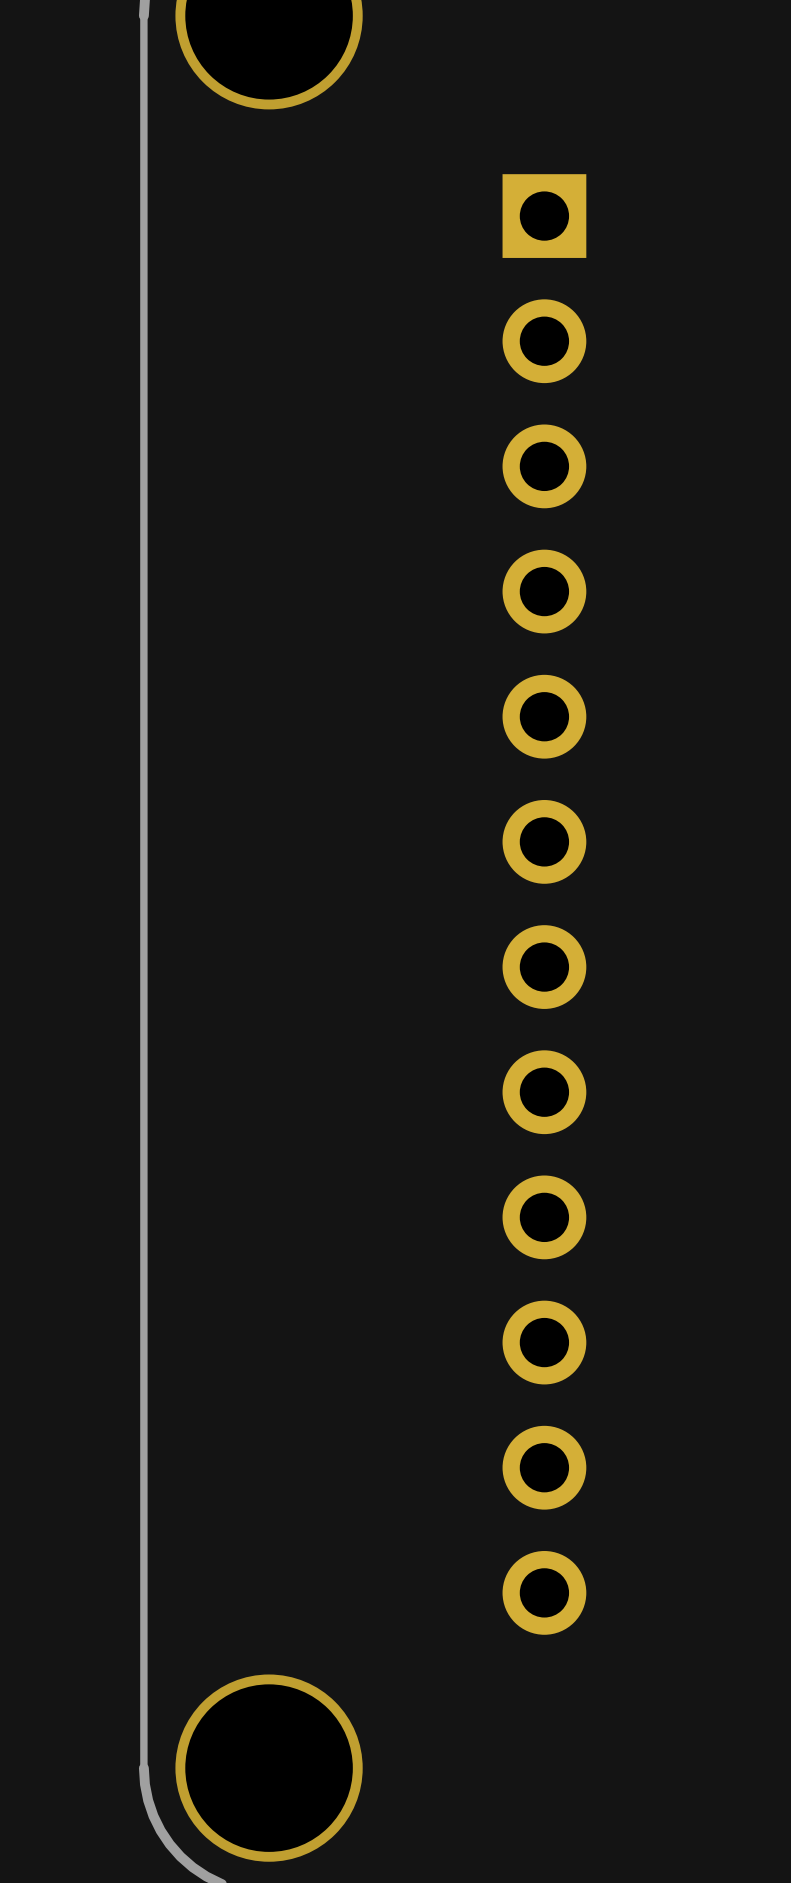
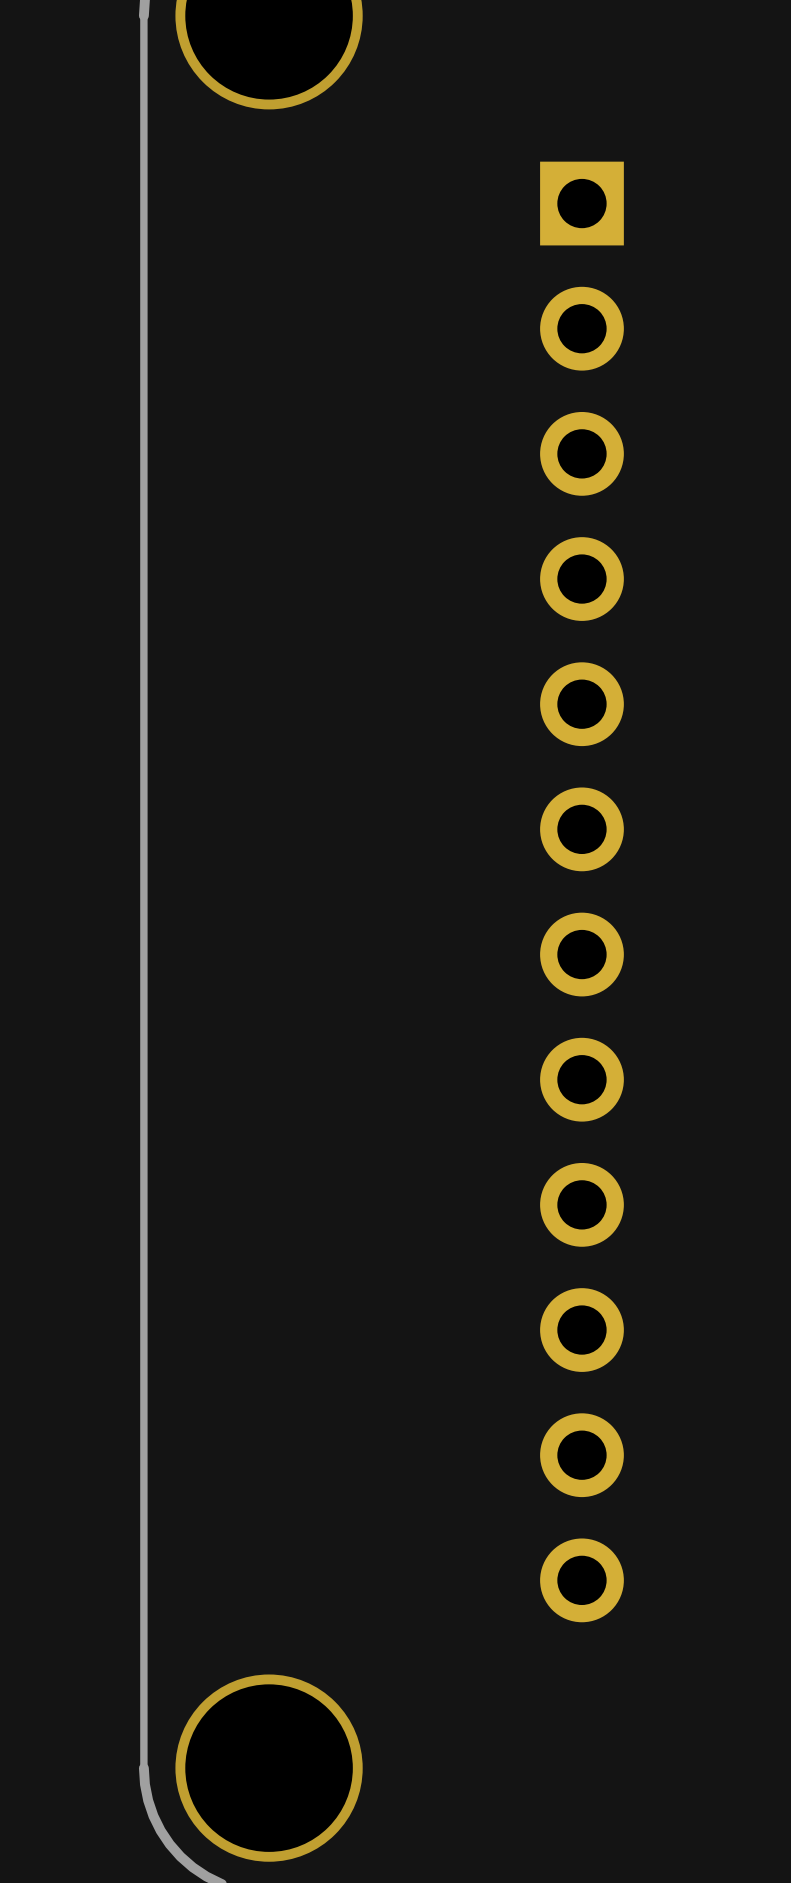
part position: (544, 904) -> (581, 891)

